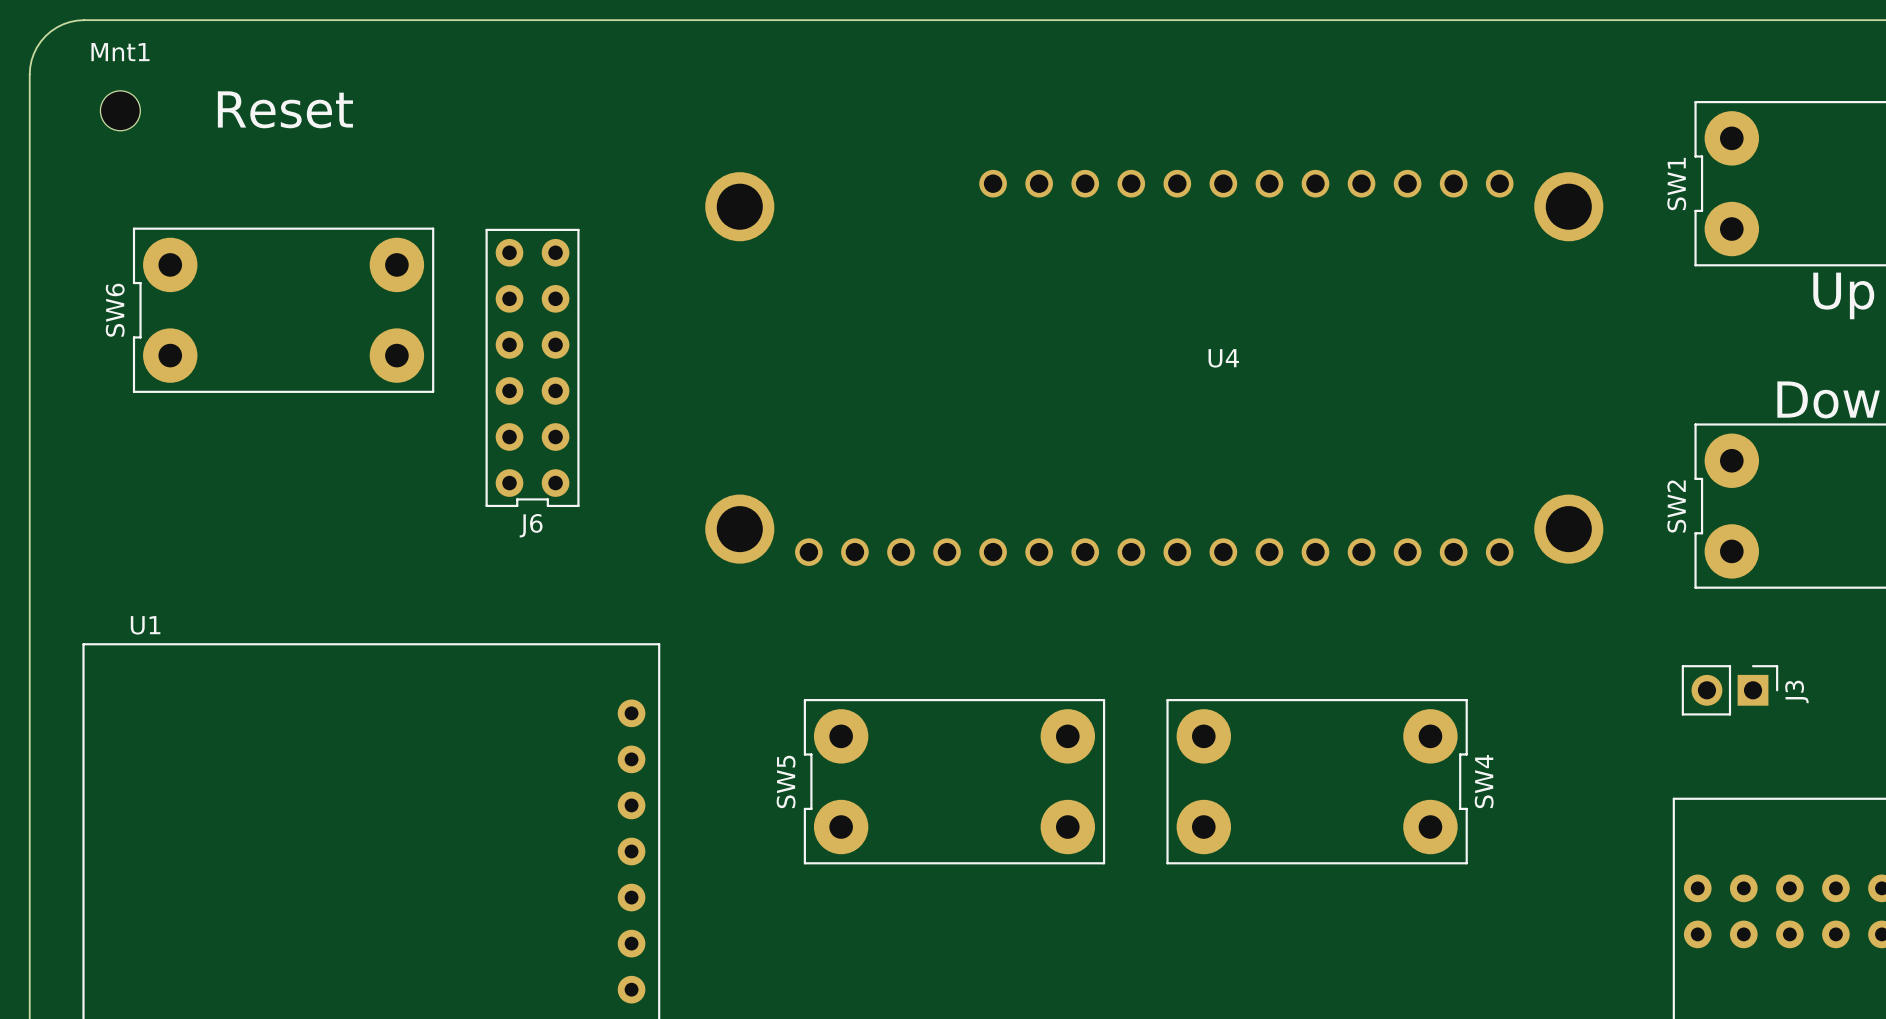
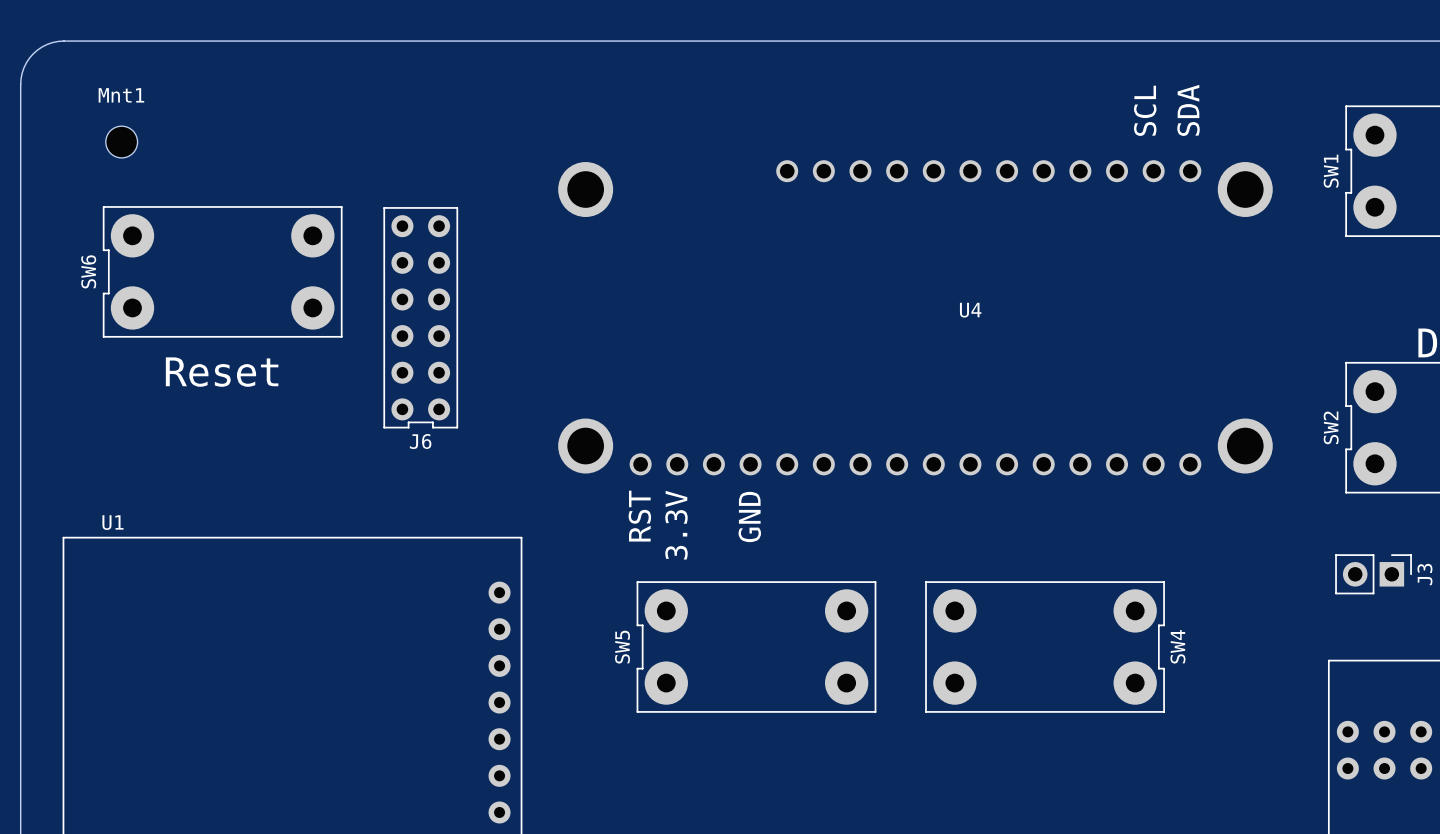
text: none -> SCL (1145, 110)
text position: Reset (285, 109) -> Reset (222, 372)
Mnt1 position: (120, 110) -> (121, 142)
text: none -> SDA (1188, 110)
text: none -> RST (639, 516)
text: none -> 3.3V (676, 525)
text: none -> GND (749, 516)

